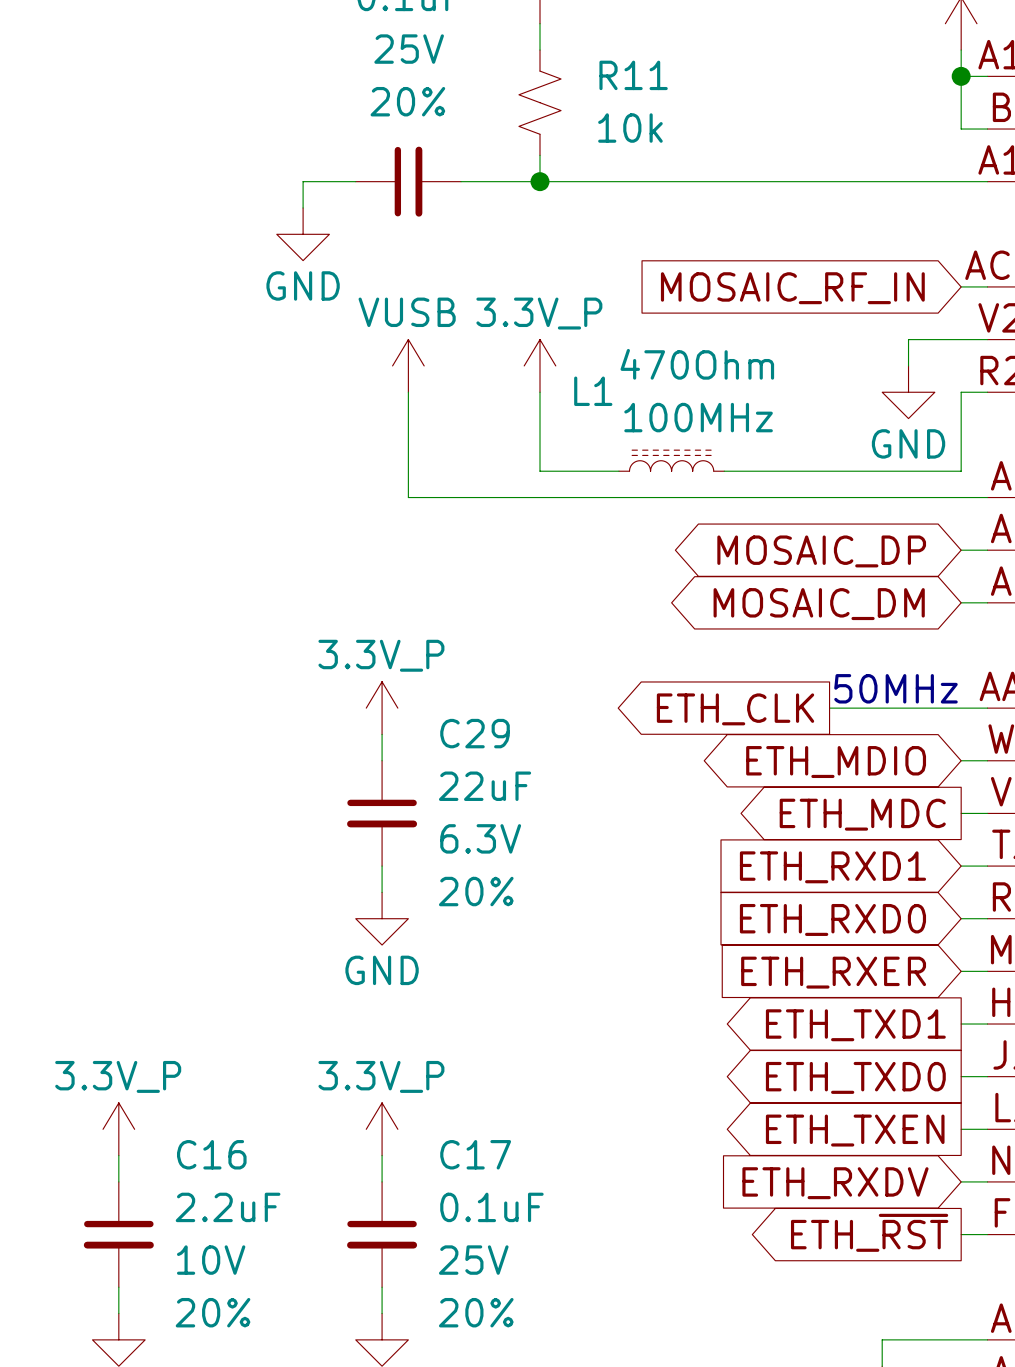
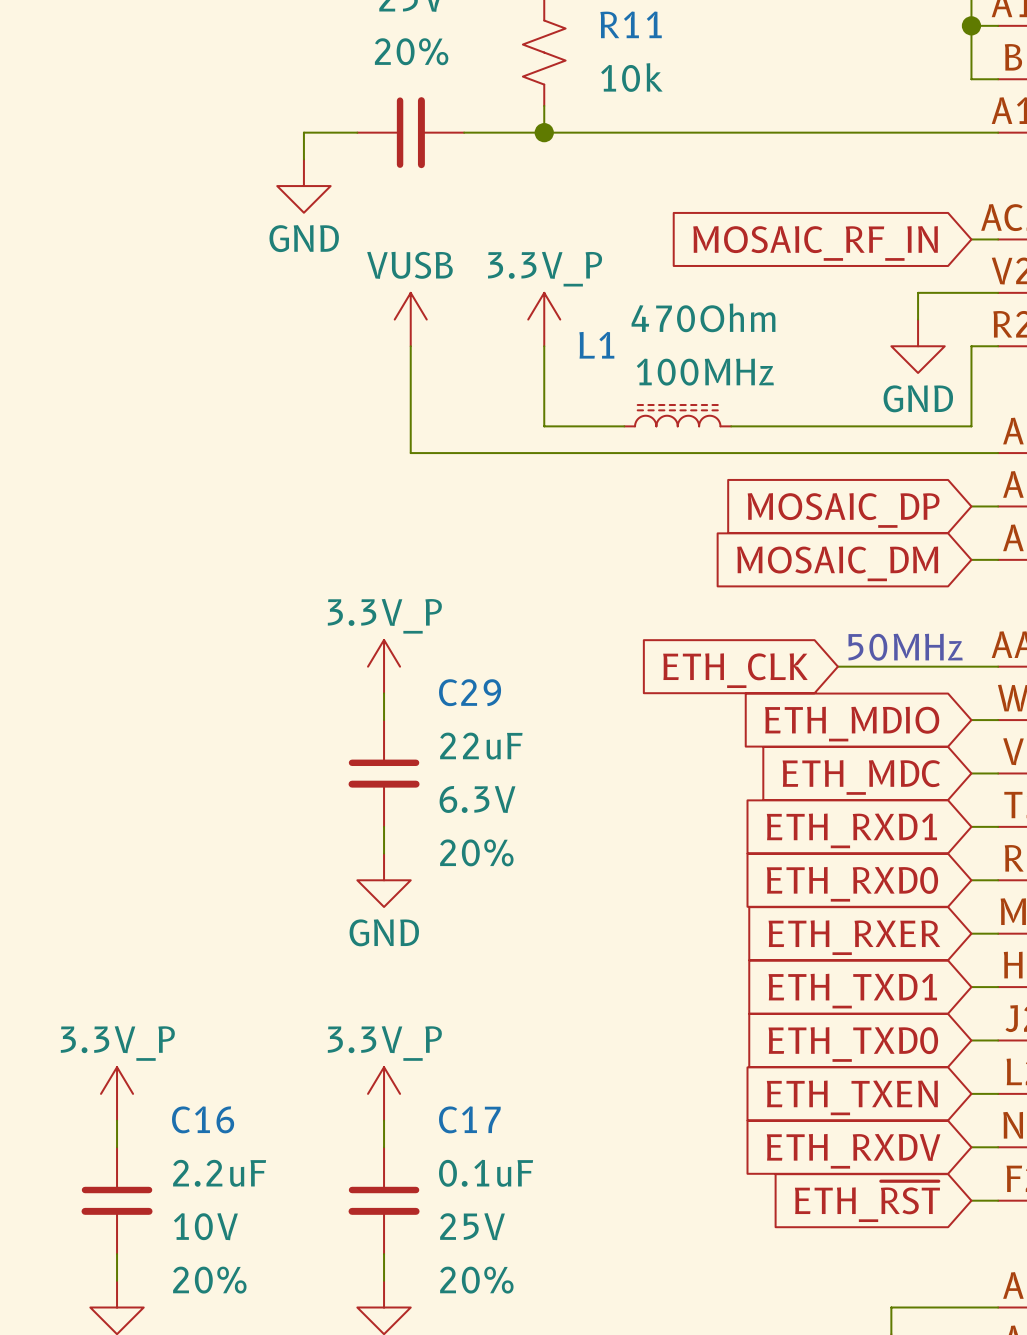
global label shape: bidirectional (821, 551) -> input (843, 510)
global label shape: bidirectional (819, 604) -> input (837, 563)
global label shape: output (735, 709) -> input (735, 670)
global label shape: bidirectional (836, 762) -> input (852, 724)
global label shape: output (862, 814) -> input (861, 777)
global label shape: output (855, 1025) -> input (852, 991)
global label shape: output (855, 1077) -> input (853, 1044)
global label shape: output (855, 1130) -> input (852, 1097)
global label shape: output (869, 1232) -> input (867, 1201)

